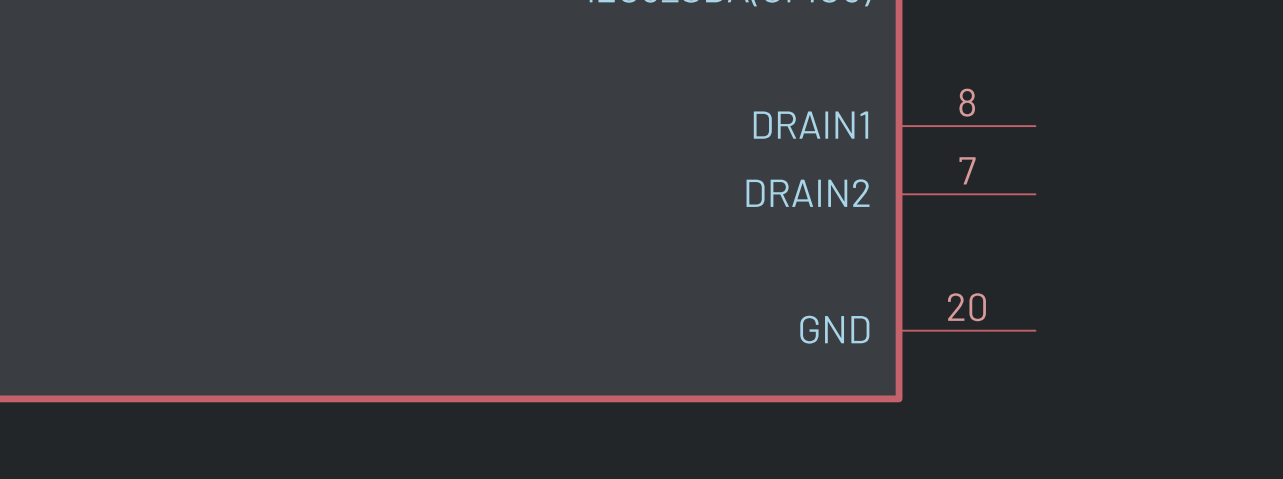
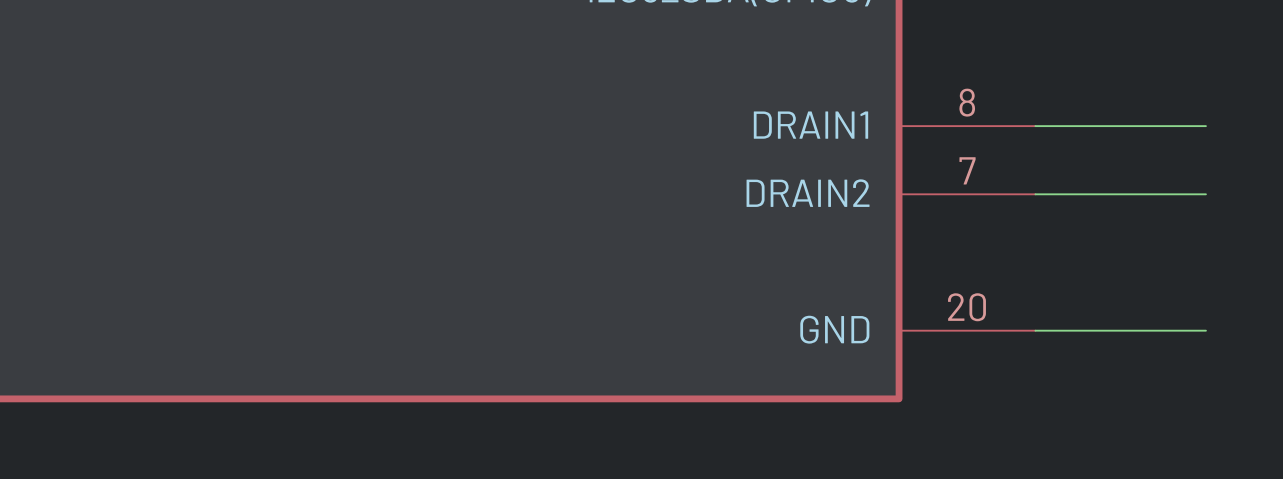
wire: none -> (1035, 126) (1205, 126)
wire: none -> (1035, 194) (1205, 194)
wire: none -> (1035, 330) (1205, 330)

